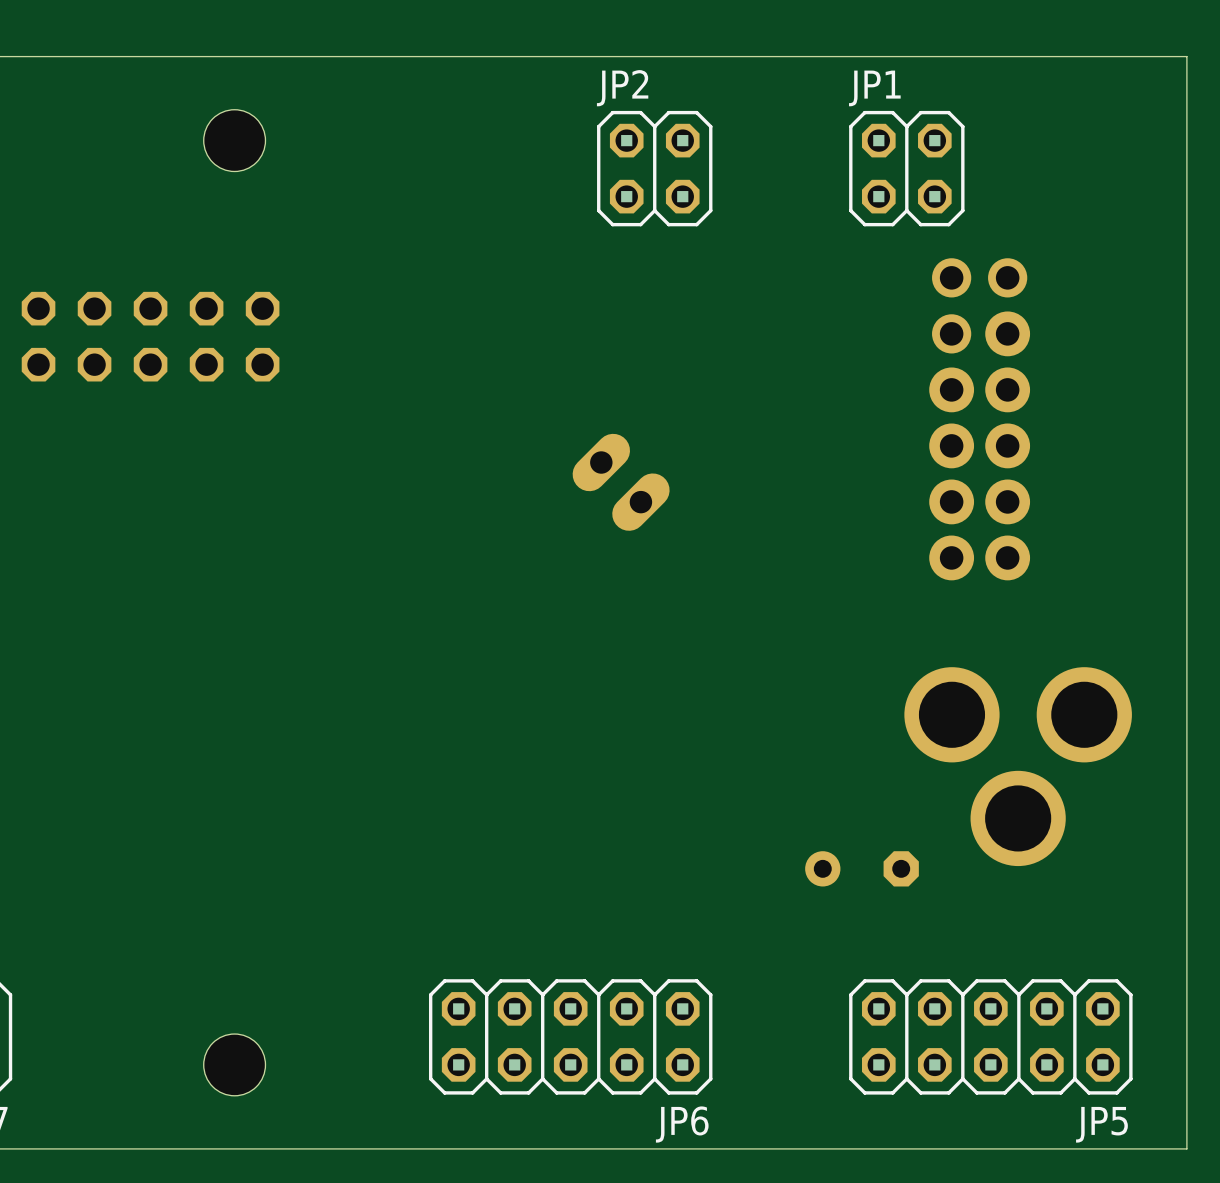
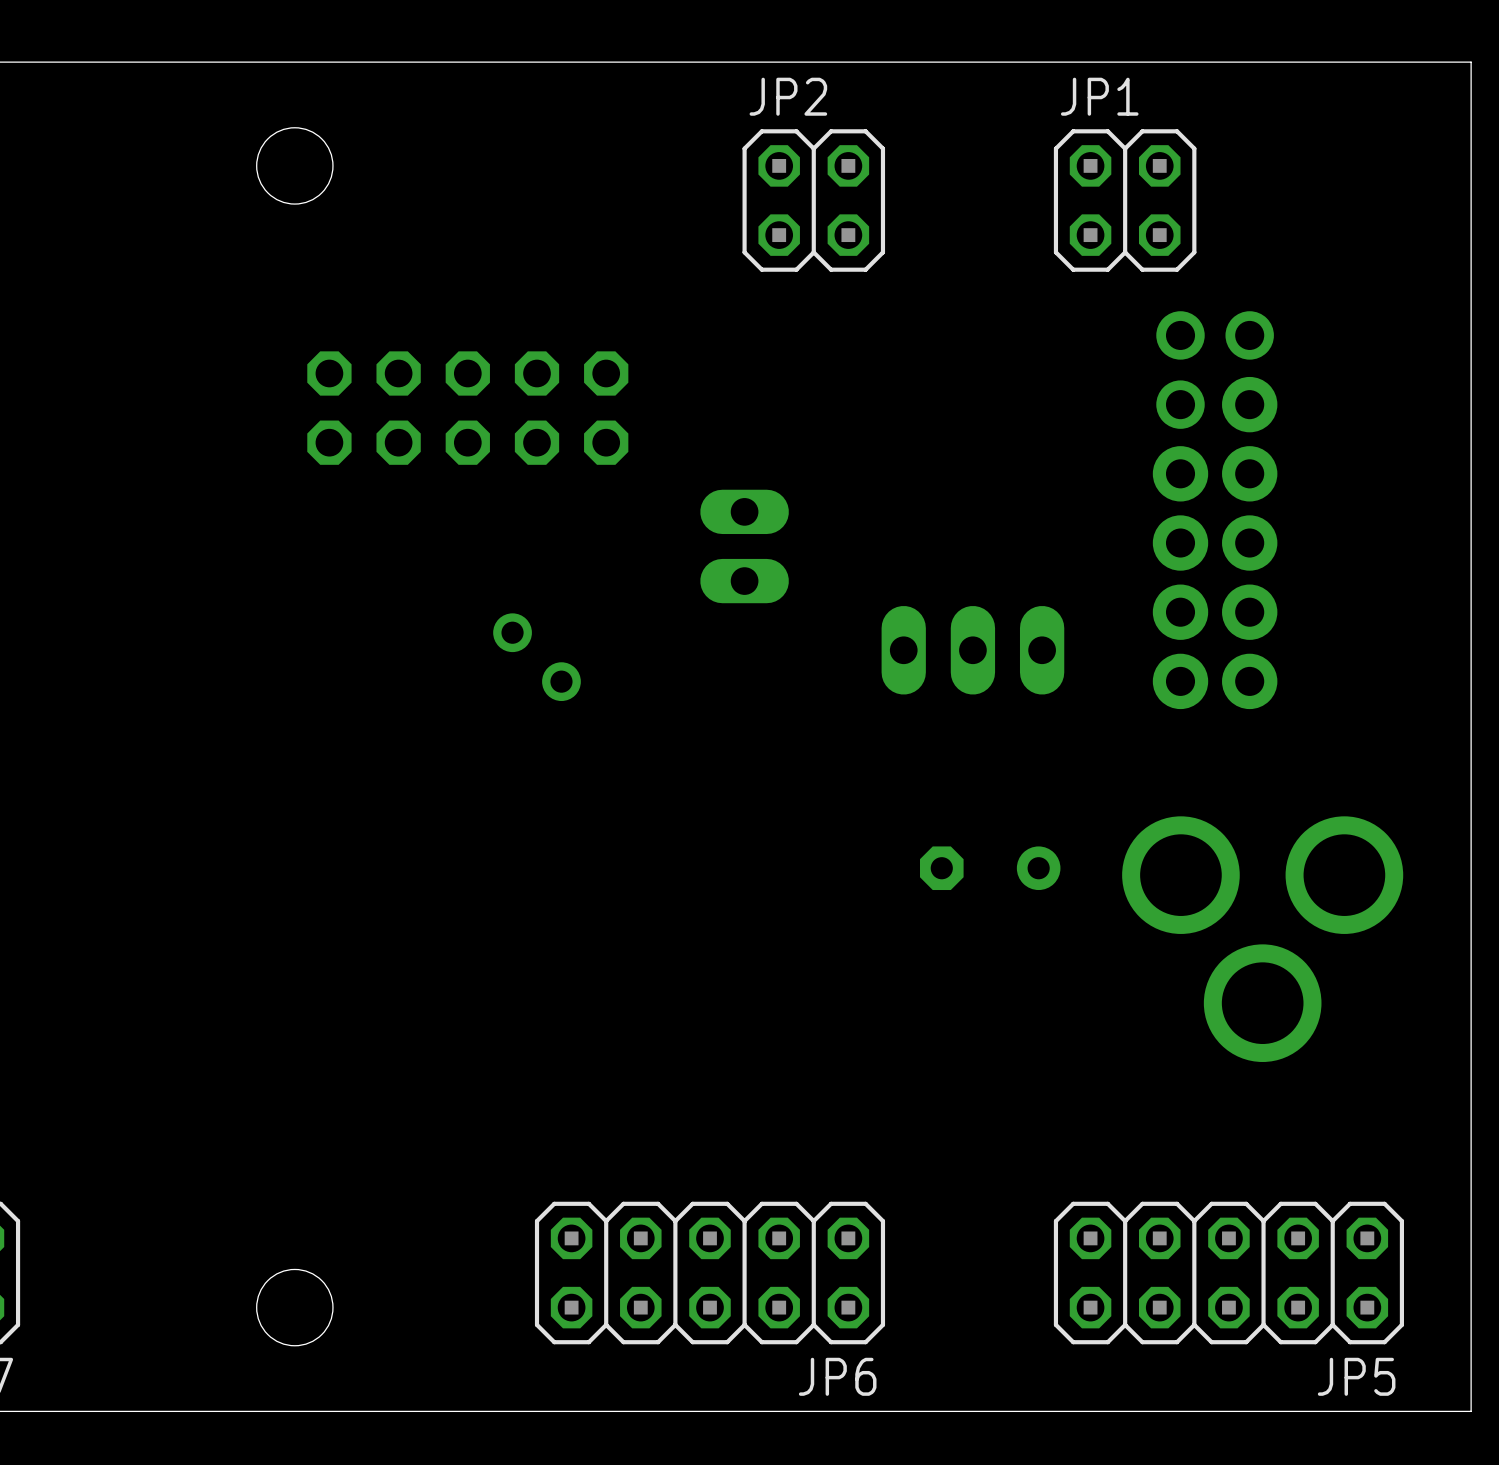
part: (150, 336) -> none
part: none -> (467, 408)
part: none -> (744, 546)
part: (621, 482) -> none
part: none -> (972, 650)
part: none -> (537, 657)
part rotation: 0° (862, 868) -> 180° (990, 868)
part position: (862, 868) -> (990, 868)

